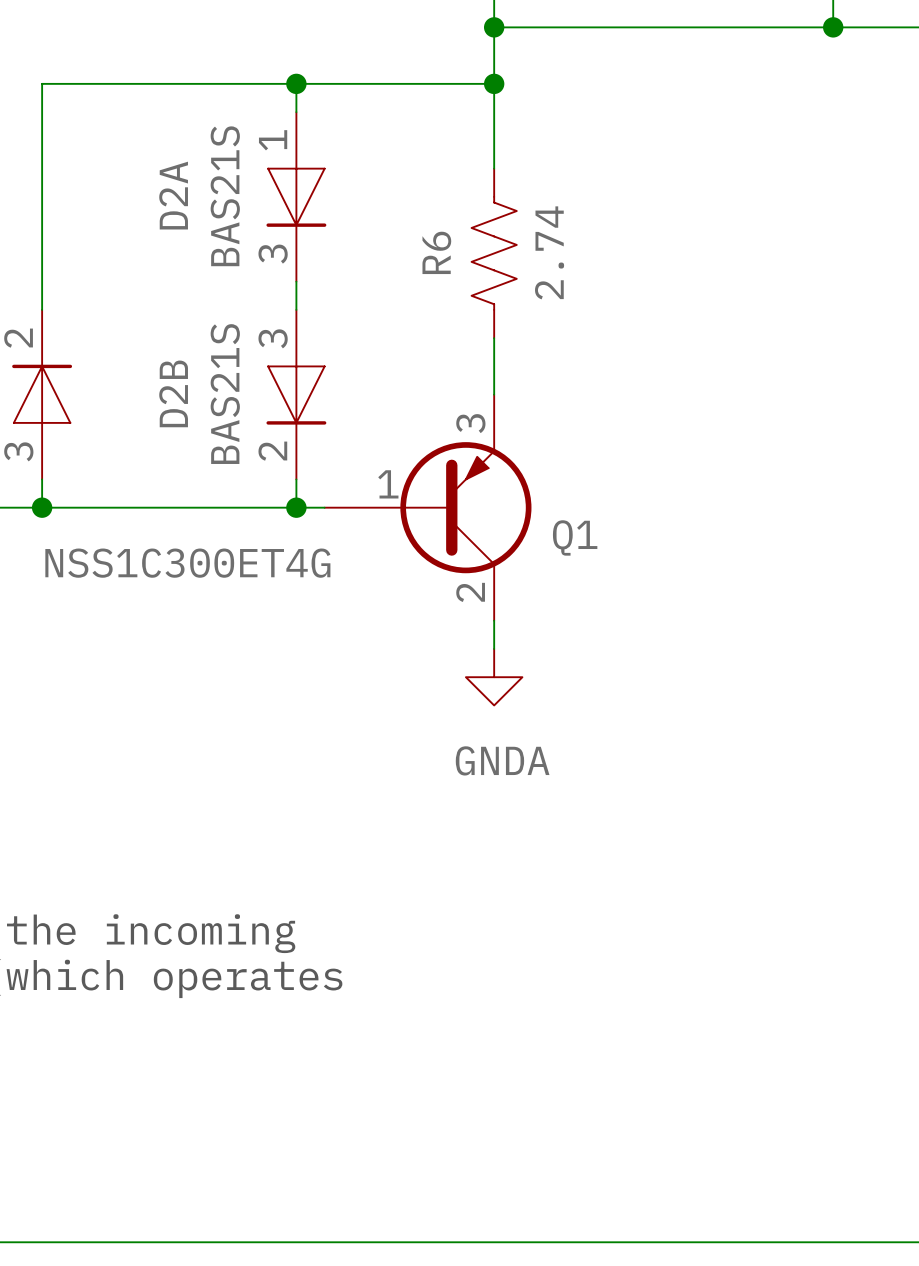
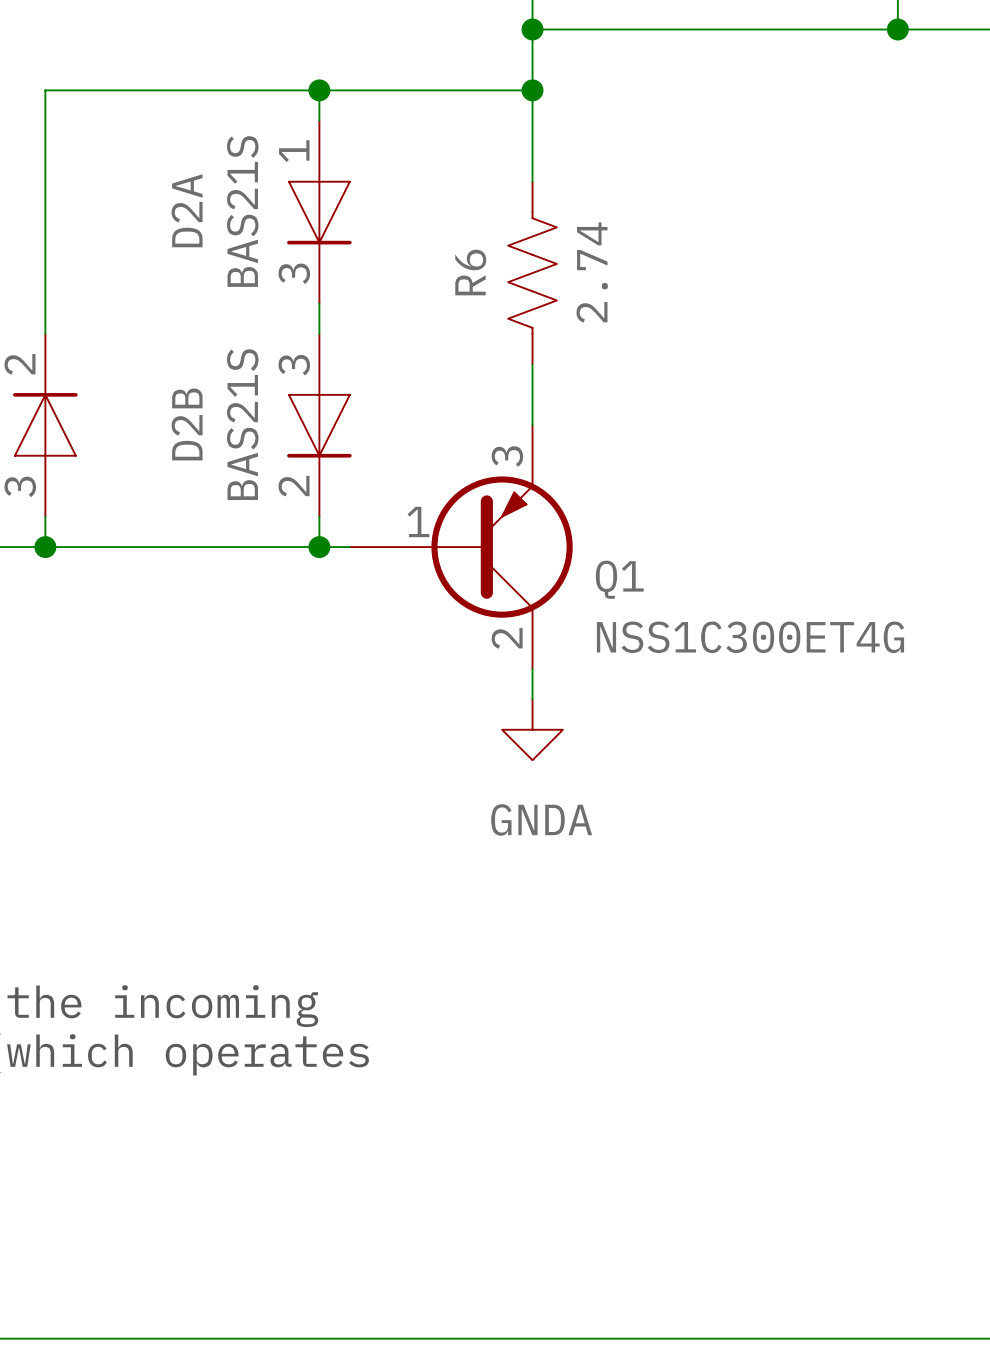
Q1 value position: NSS1C300ET4G (187, 563) -> NSS1C300ET4G (750, 637)

